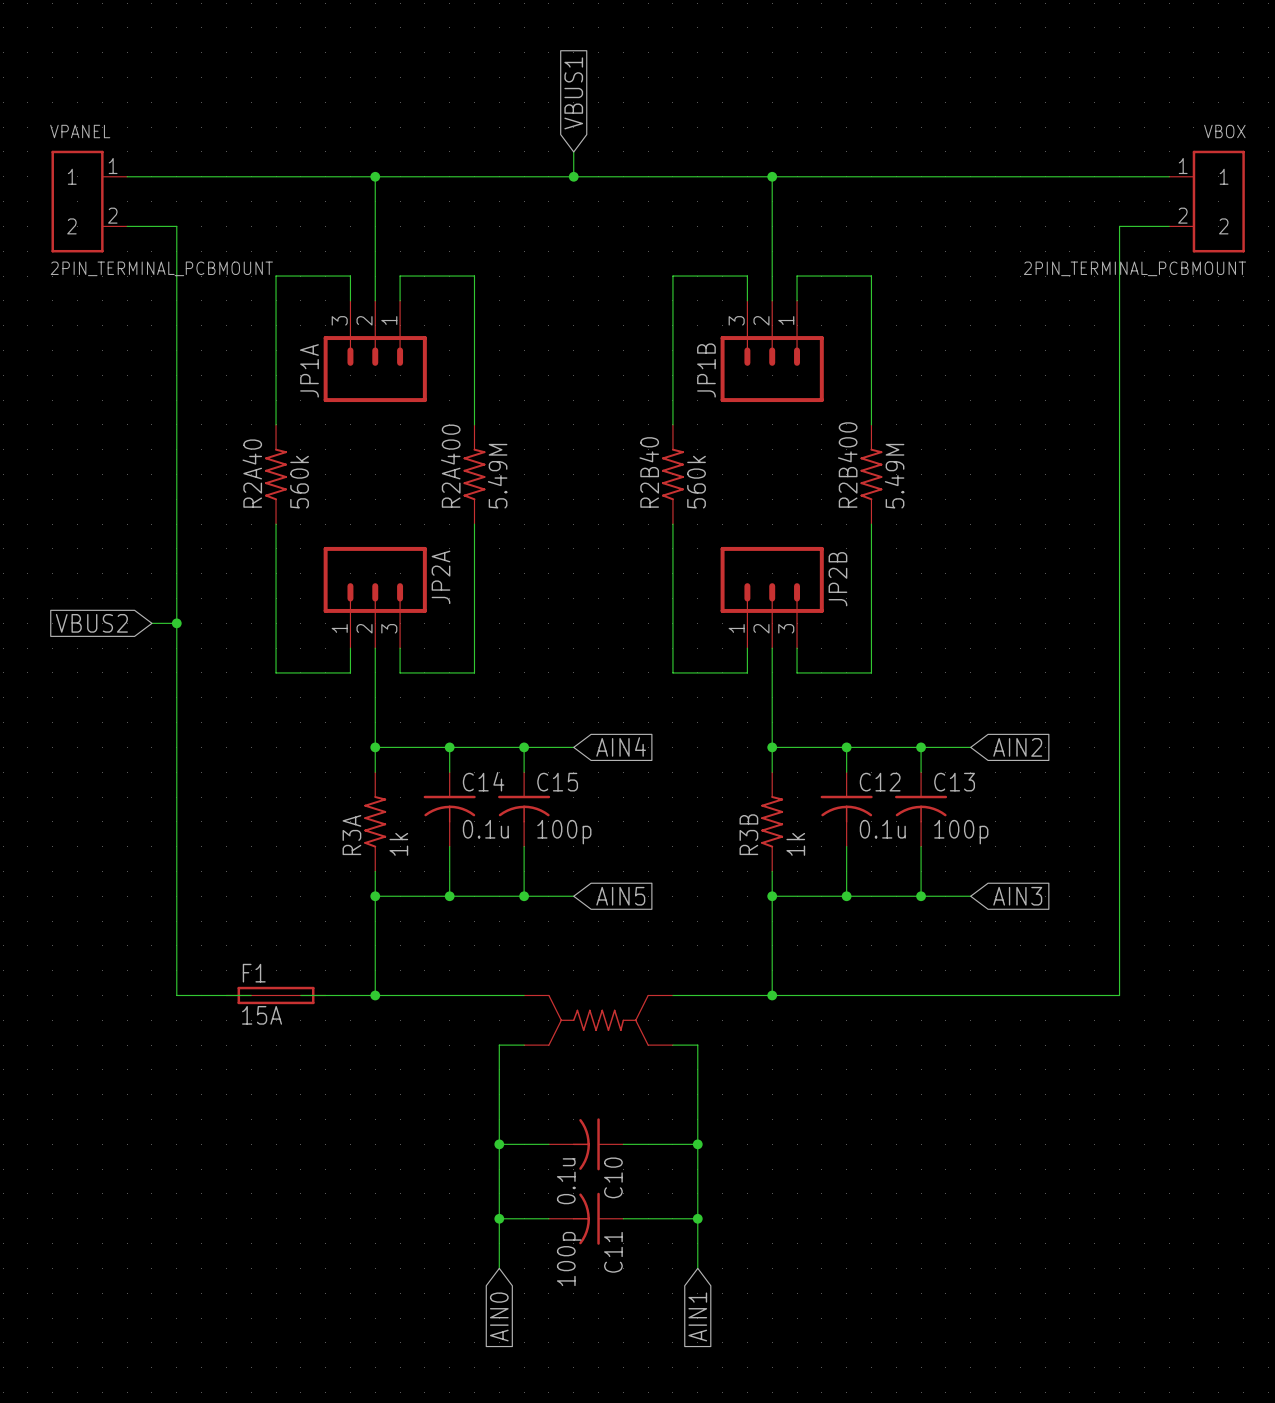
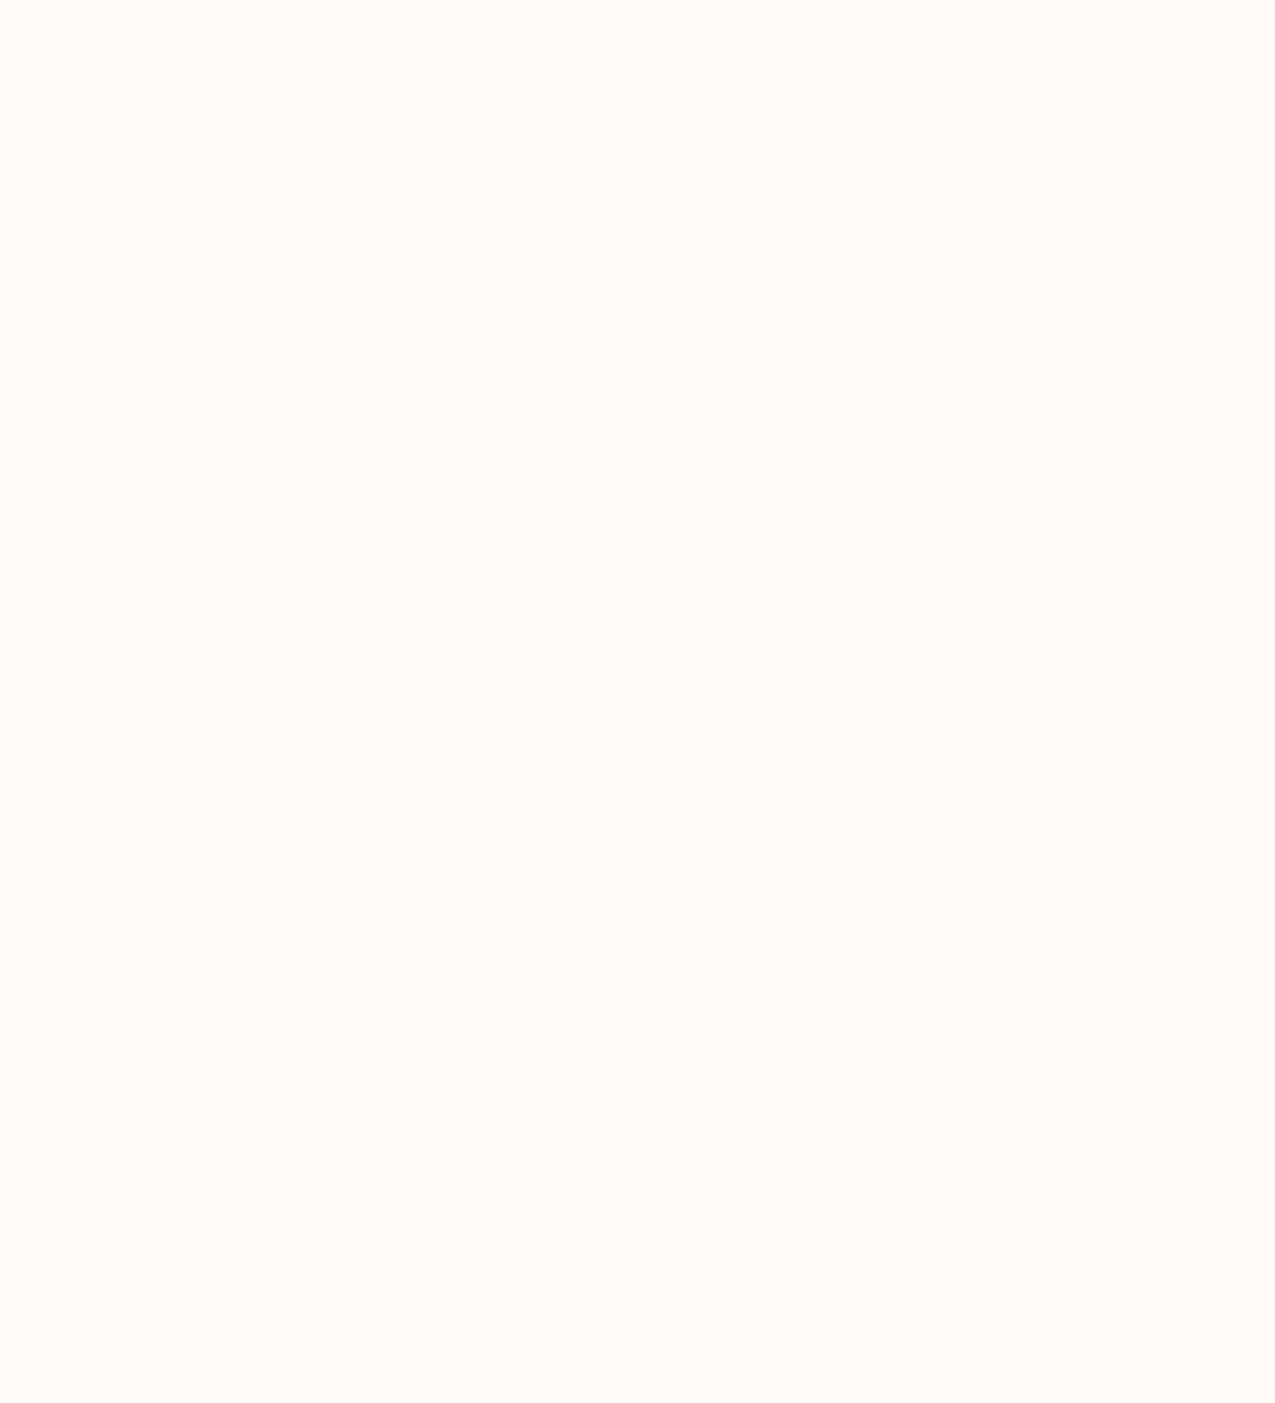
global label: VBUS1 (573, 93) -> none
wire: (573, 151) (573, 176) -> none
wire: (127, 176) (1169, 176) -> none
wire: (375, 176) (375, 300) -> none
junction: (375, 176) -> none
junction: (573, 176) -> none
wire: (772, 176) (772, 300) -> none
junction: (772, 176) -> none
VPANEL: 2PIN_TERMINAL_PCBMOUNT (89, 201) -> none
VBOX: 2PIN_TERMINAL_PCBMOUNT (1206, 201) -> none
wire: (127, 226) (176, 226) (176, 995) (251, 995) -> none
wire: (1169, 226) (1119, 226) (1119, 995) (672, 995) -> none
wire: (350, 300) (350, 276) (276, 276) (276, 424) -> none
wire: (400, 300) (400, 276) (474, 276) (474, 424) -> none
wire: (747, 300) (747, 276) (672, 276) (672, 424) -> none
wire: (797, 300) (797, 276) (871, 276) (871, 424) -> none
JP1A: (375, 351) -> none
JP1B: (772, 351) -> none
R2A40: 560k (276, 474) -> none
R2A400: 5.49M (474, 474) -> none
R2B40: 560k (672, 474) -> none
R2B400: 5.49M (871, 474) -> none
wire: (276, 524) (276, 672) (350, 672) (350, 648) -> none
wire: (474, 524) (474, 672) (400, 672) (400, 648) -> none
wire: (672, 524) (672, 672) (747, 672) (747, 648) -> none
wire: (871, 524) (871, 672) (797, 672) (797, 648) -> none
JP2A: (375, 597) -> none
JP2B: (772, 597) -> none
global label: VBUS2 (91, 623) -> none
wire: (151, 623) (176, 623) -> none
junction: (176, 623) -> none
wire: (375, 648) (375, 772) -> none
wire: (772, 648) (772, 772) -> none
global label: AIN4 (621, 746) -> none
wire: (375, 747) (573, 747) -> none
junction: (375, 747) -> none
wire: (449, 747) (449, 772) -> none
junction: (449, 747) -> none
wire: (524, 747) (524, 772) -> none
junction: (524, 747) -> none
wire: (772, 747) (970, 747) -> none
junction: (772, 747) -> none
wire: (846, 747) (846, 772) -> none
junction: (846, 747) -> none
wire: (921, 747) (921, 772) -> none
junction: (921, 747) -> none
global label: AIN2 (1017, 747) -> none
C14: 0.1u (449, 809) -> none
C15: 100p (524, 809) -> none
C12: 0.1u (846, 809) -> none
C13: 100p (921, 809) -> none
R3A: 1k (375, 821) -> none
R3B: 1k (772, 821) -> none
wire: (449, 846) (449, 896) -> none
wire: (524, 846) (524, 896) -> none
wire: (846, 846) (846, 896) -> none
wire: (921, 846) (921, 896) -> none
wire: (375, 871) (375, 995) -> none
wire: (772, 871) (772, 995) -> none
wire: (375, 896) (573, 896) -> none
junction: (375, 896) -> none
junction: (449, 896) -> none
junction: (524, 896) -> none
global label: AIN5 (620, 896) -> none
wire: (772, 896) (970, 896) -> none
junction: (772, 896) -> none
junction: (846, 896) -> none
junction: (921, 896) -> none
global label: AIN3 (1017, 896) -> none
F1: 15A (276, 995) -> none
wire: (300, 995) (524, 995) -> none
junction: (375, 995) -> none
junction: (772, 995) -> none
part: (598, 1020) -> none
wire: (524, 1045) (499, 1045) (499, 1268) -> none
wire: (672, 1045) (697, 1045) (697, 1268) -> none
wire: (499, 1144) (548, 1144) -> none
junction: (499, 1144) -> none
C10: 0.1u (586, 1144) -> none
wire: (623, 1144) (697, 1144) -> none
junction: (697, 1144) -> none
wire: (499, 1218) (548, 1218) -> none
junction: (499, 1218) -> none
C11: 100p (586, 1218) -> none
wire: (623, 1218) (697, 1218) -> none
junction: (697, 1218) -> none
global label: AIN0 (499, 1316) -> none
global label: AIN1 (697, 1316) -> none

